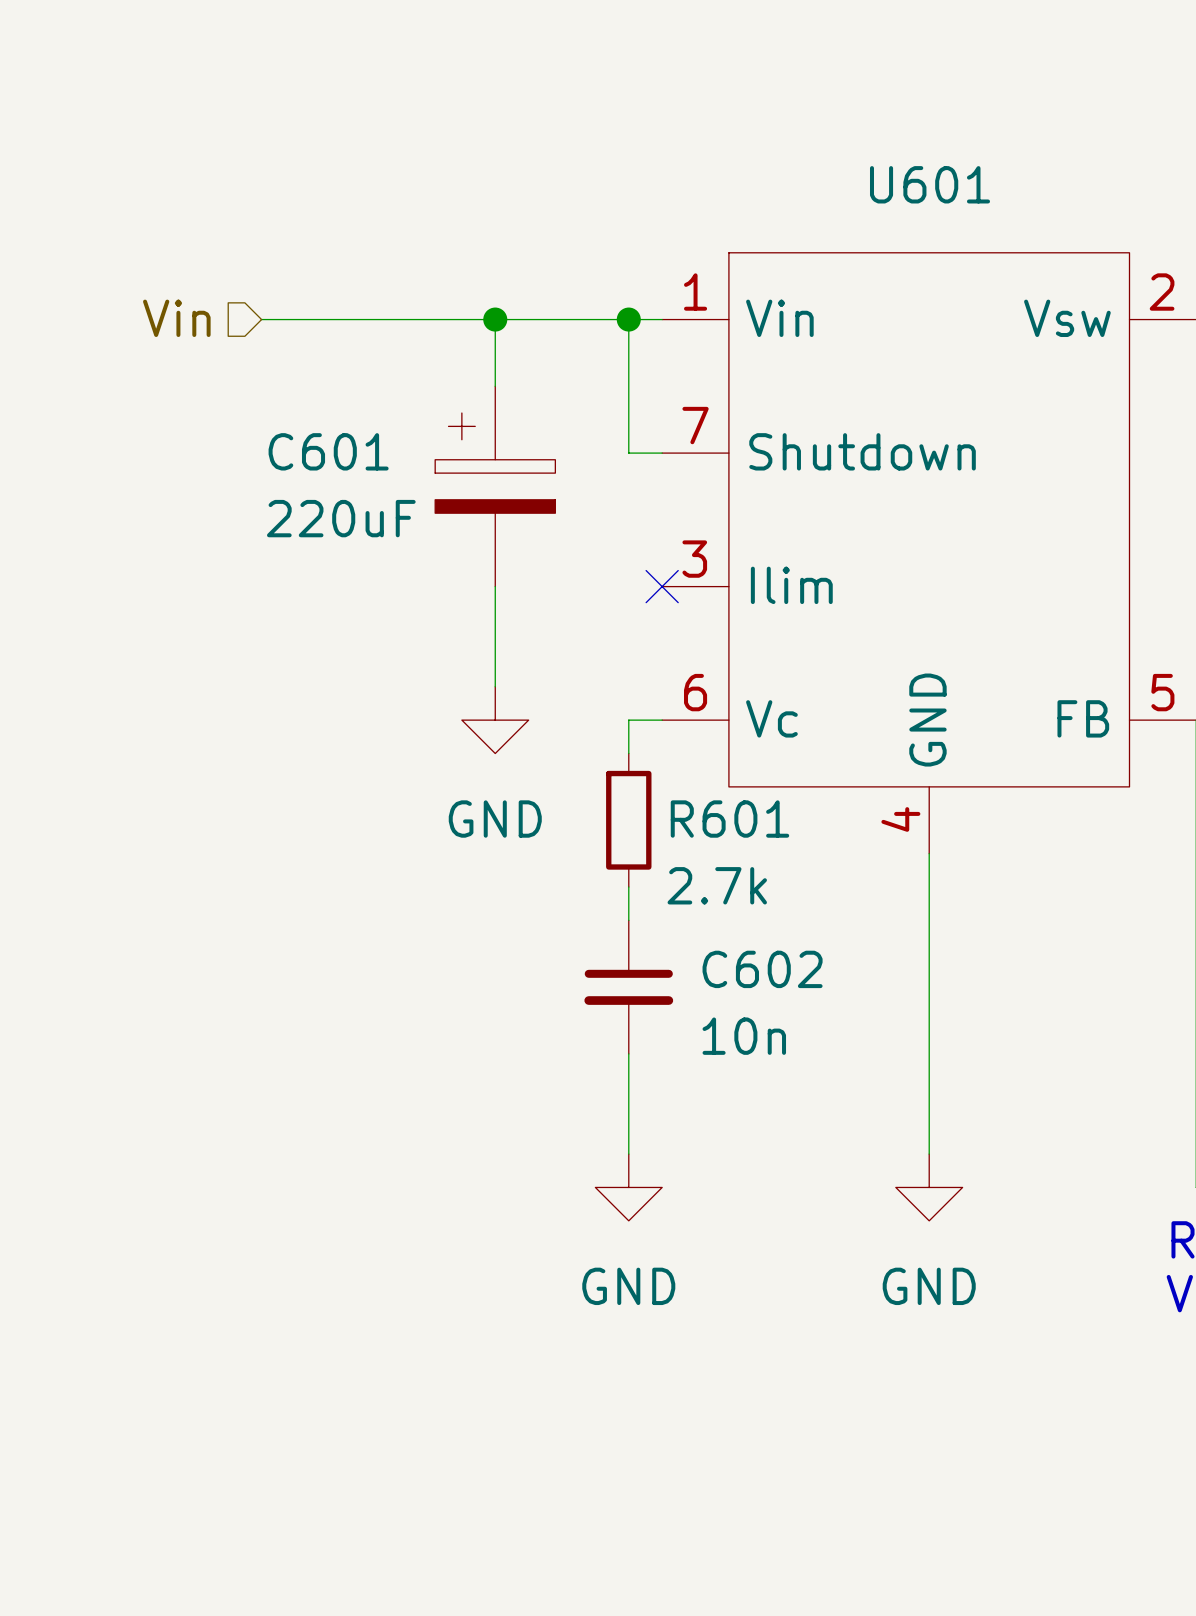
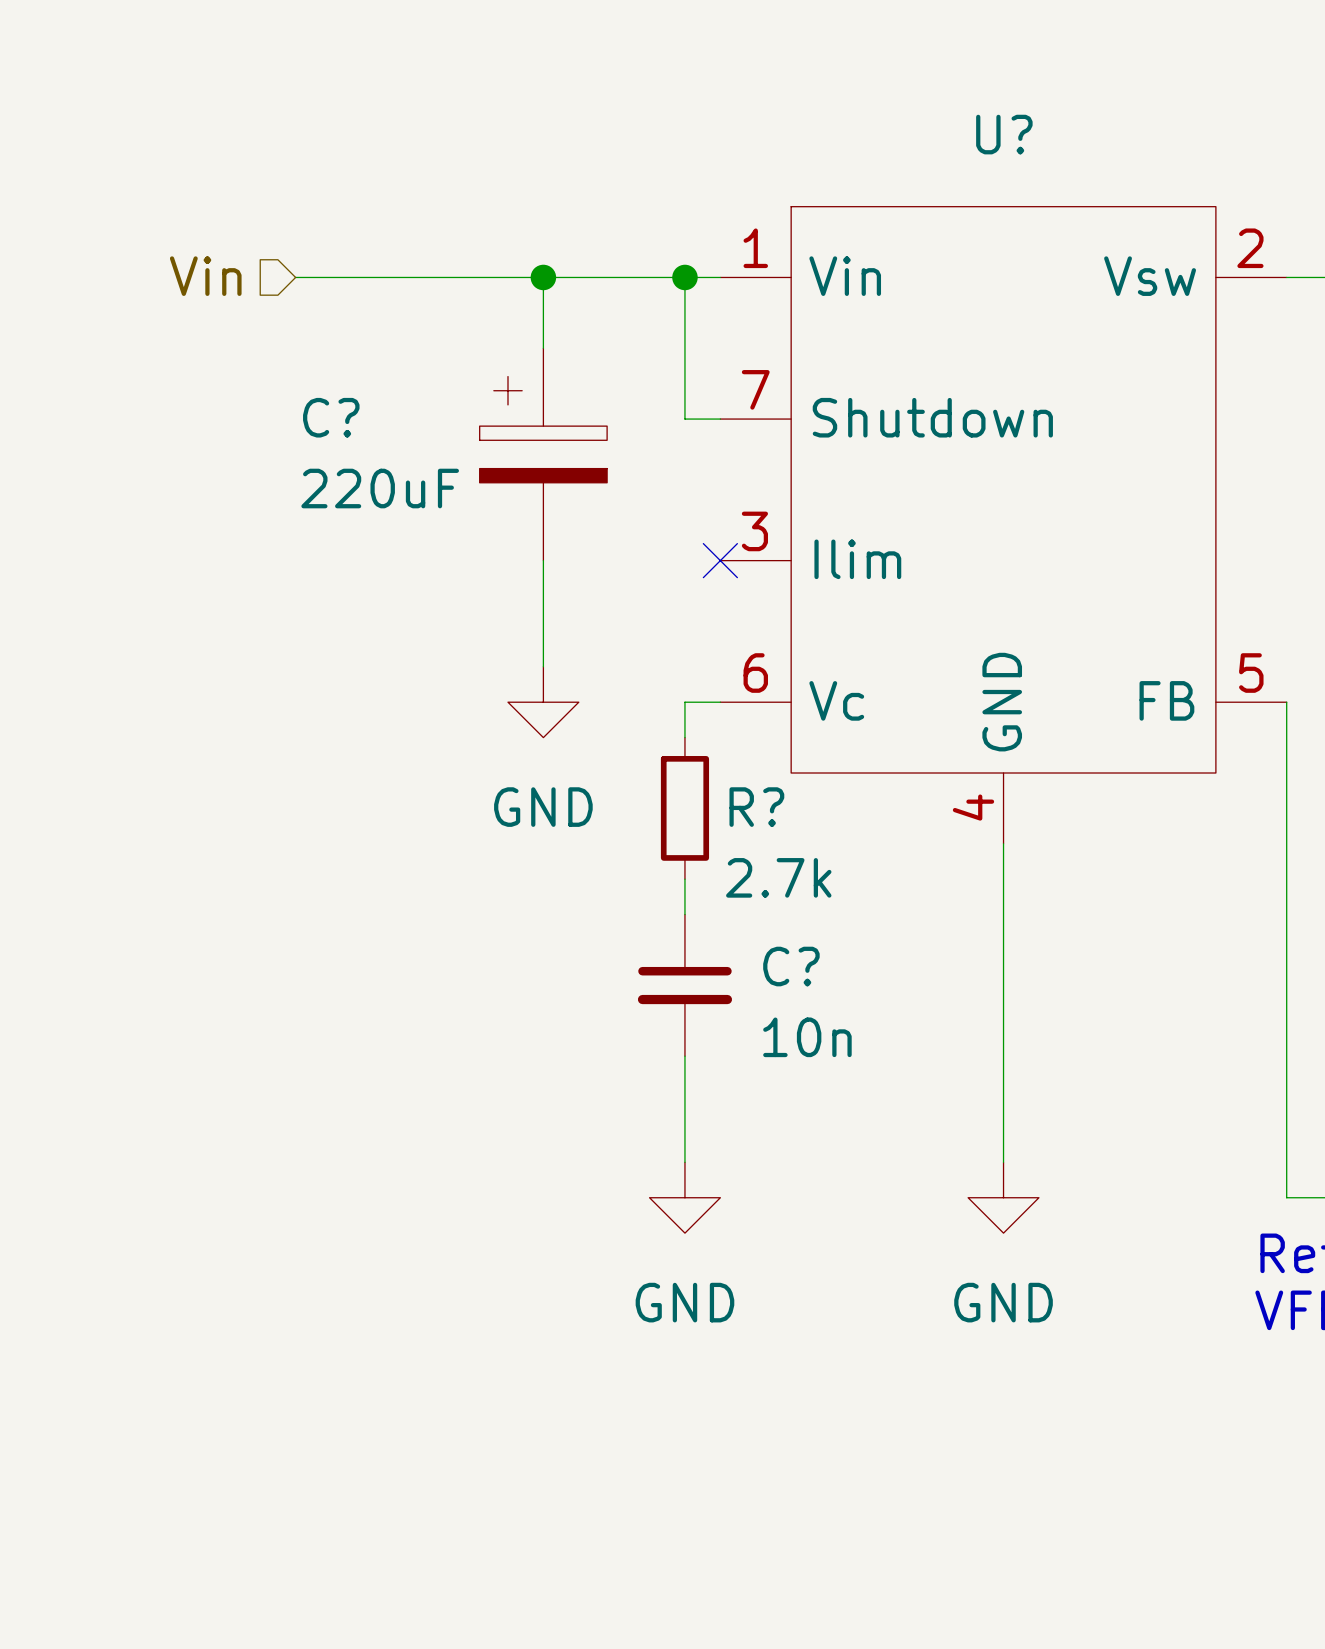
U601 name: U601 (930, 184) -> U? (1004, 134)
C601 name: C601 (328, 451) -> C? (331, 417)
R601 name: R601 (729, 819) -> R? (756, 807)
C602 name: C602 (762, 969) -> C? (791, 966)

